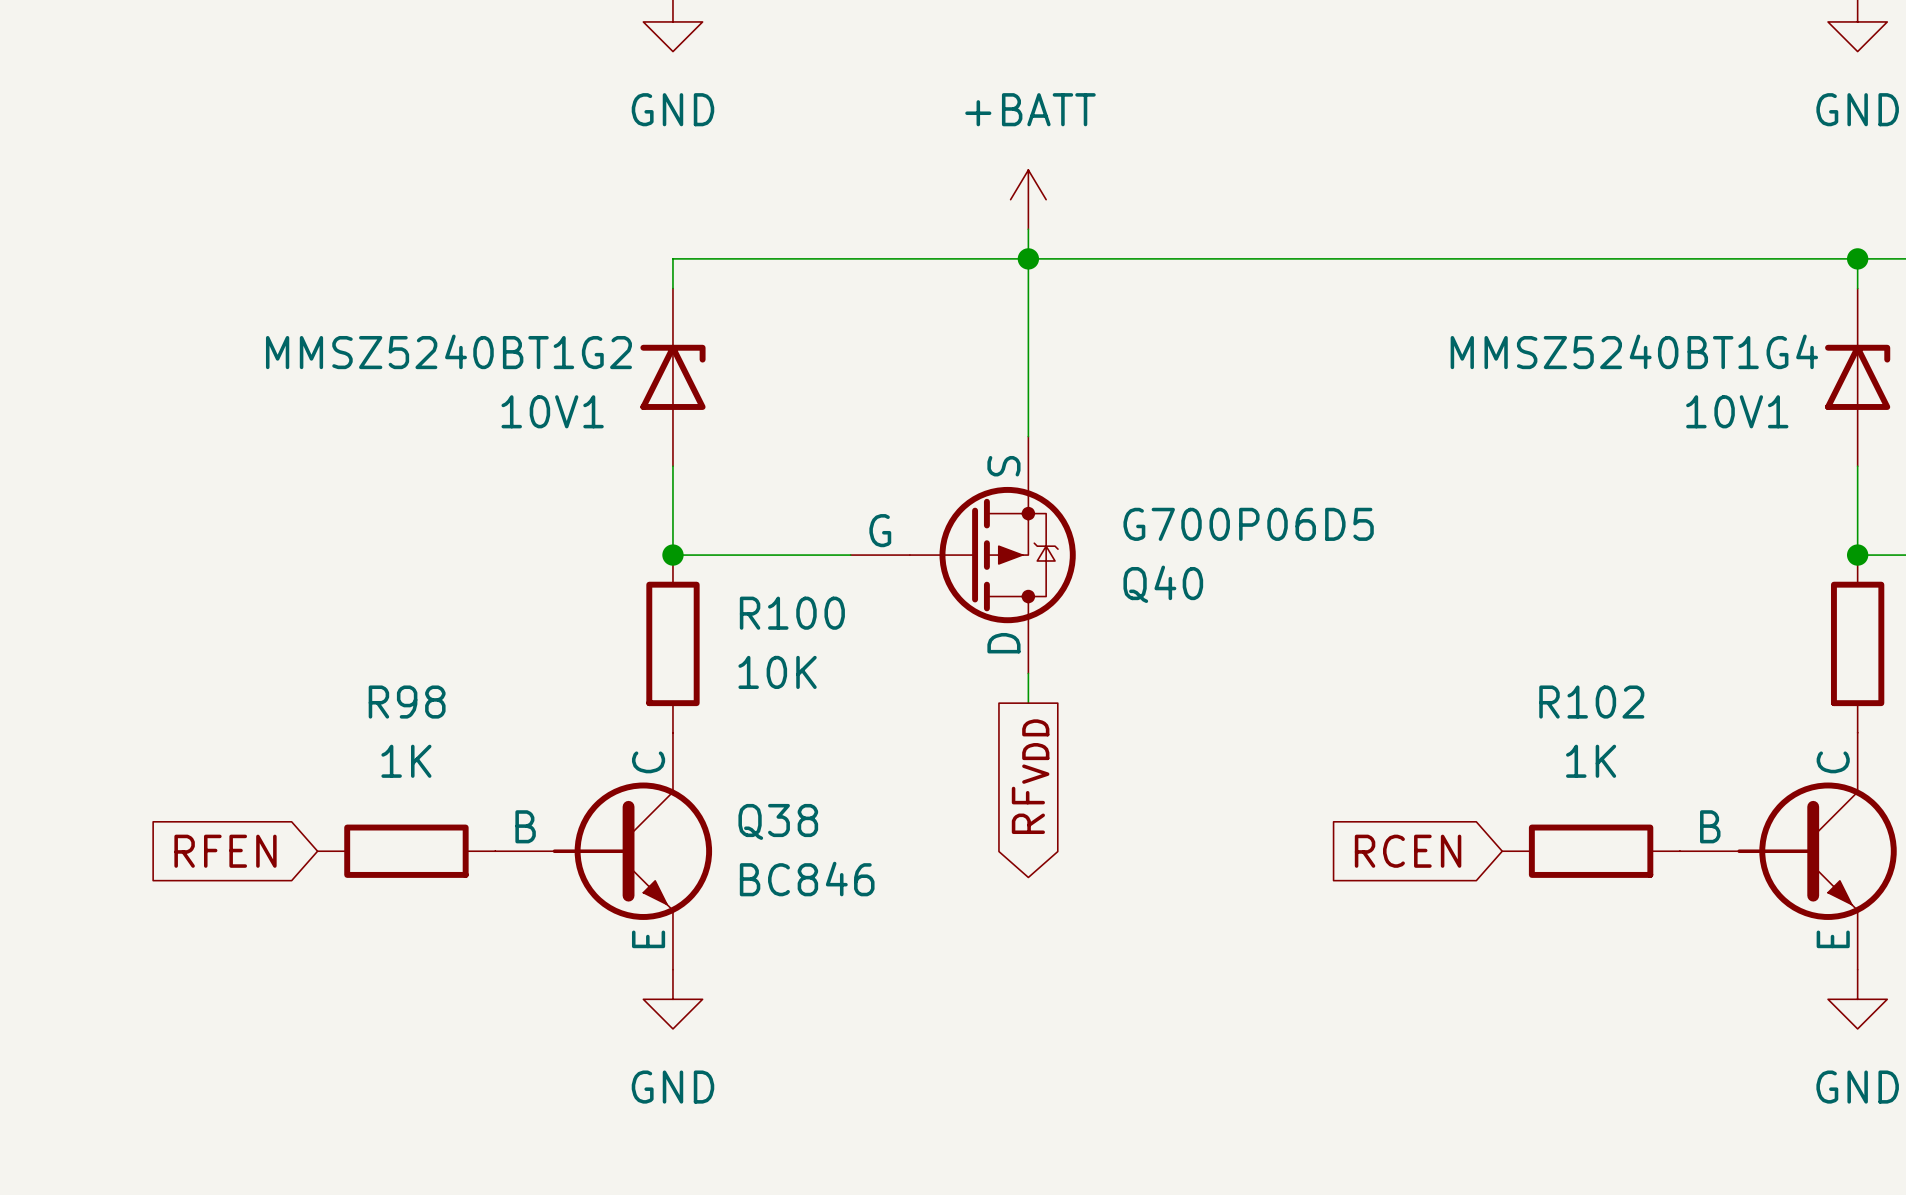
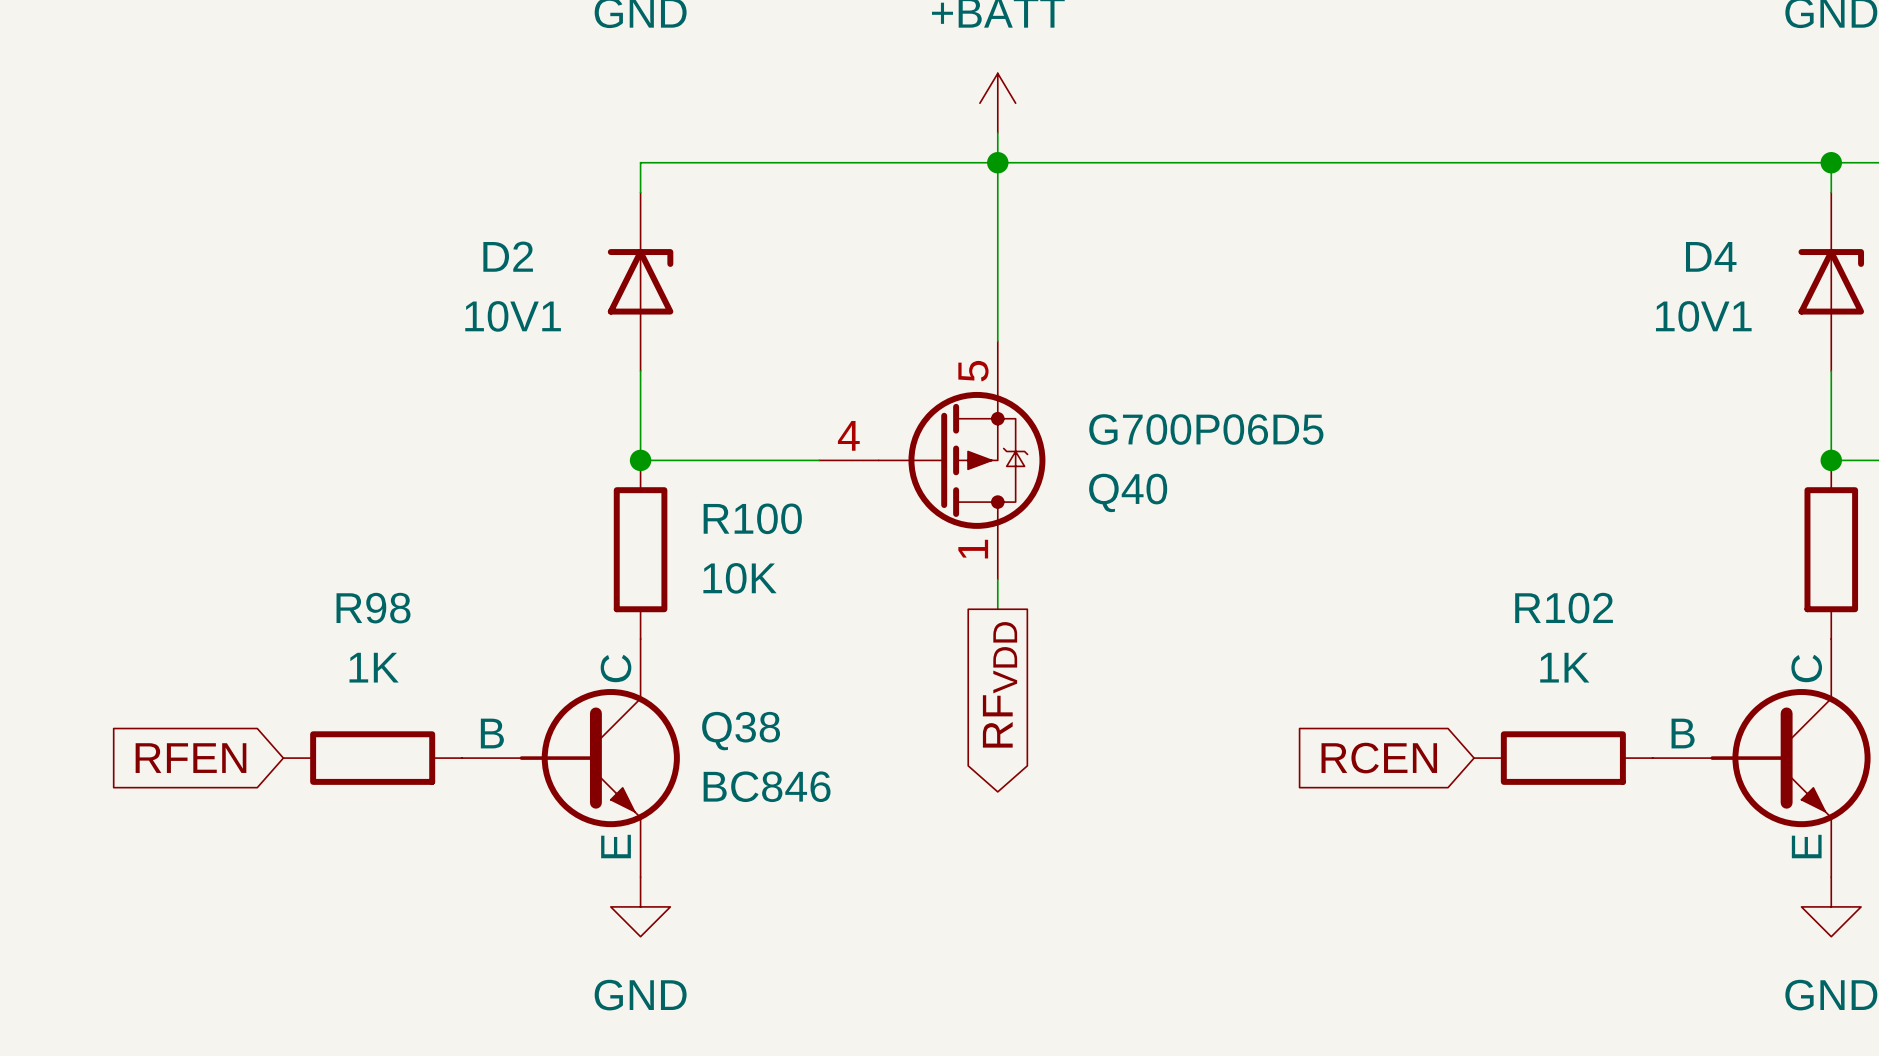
MMSZ5240BT1G2 name: MMSZ5240BT1G2 (448, 351) -> D2 (508, 256)
MMSZ5240BT1G4 name: MMSZ5240BT1G4 (1634, 351) -> D4 (1711, 256)
Q40 pin name: S (1003, 466) -> none
Q40 pin number: none -> 5 (973, 371)
Q40 pin number: none -> 4 (848, 435)
Q40 pin name: G (880, 530) -> none
Q40 pin name: D (1003, 643) -> none
Q40 pin number: none -> 1 (973, 549)

